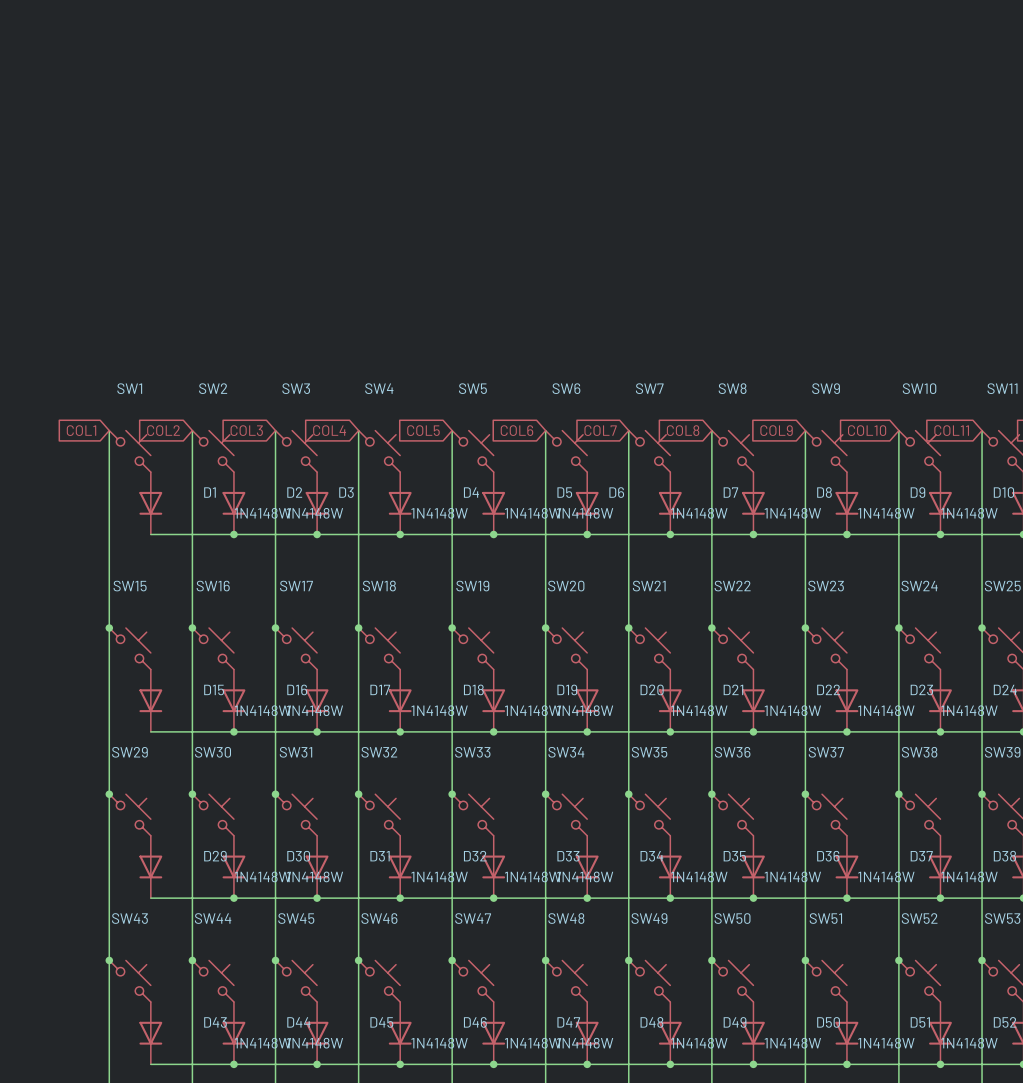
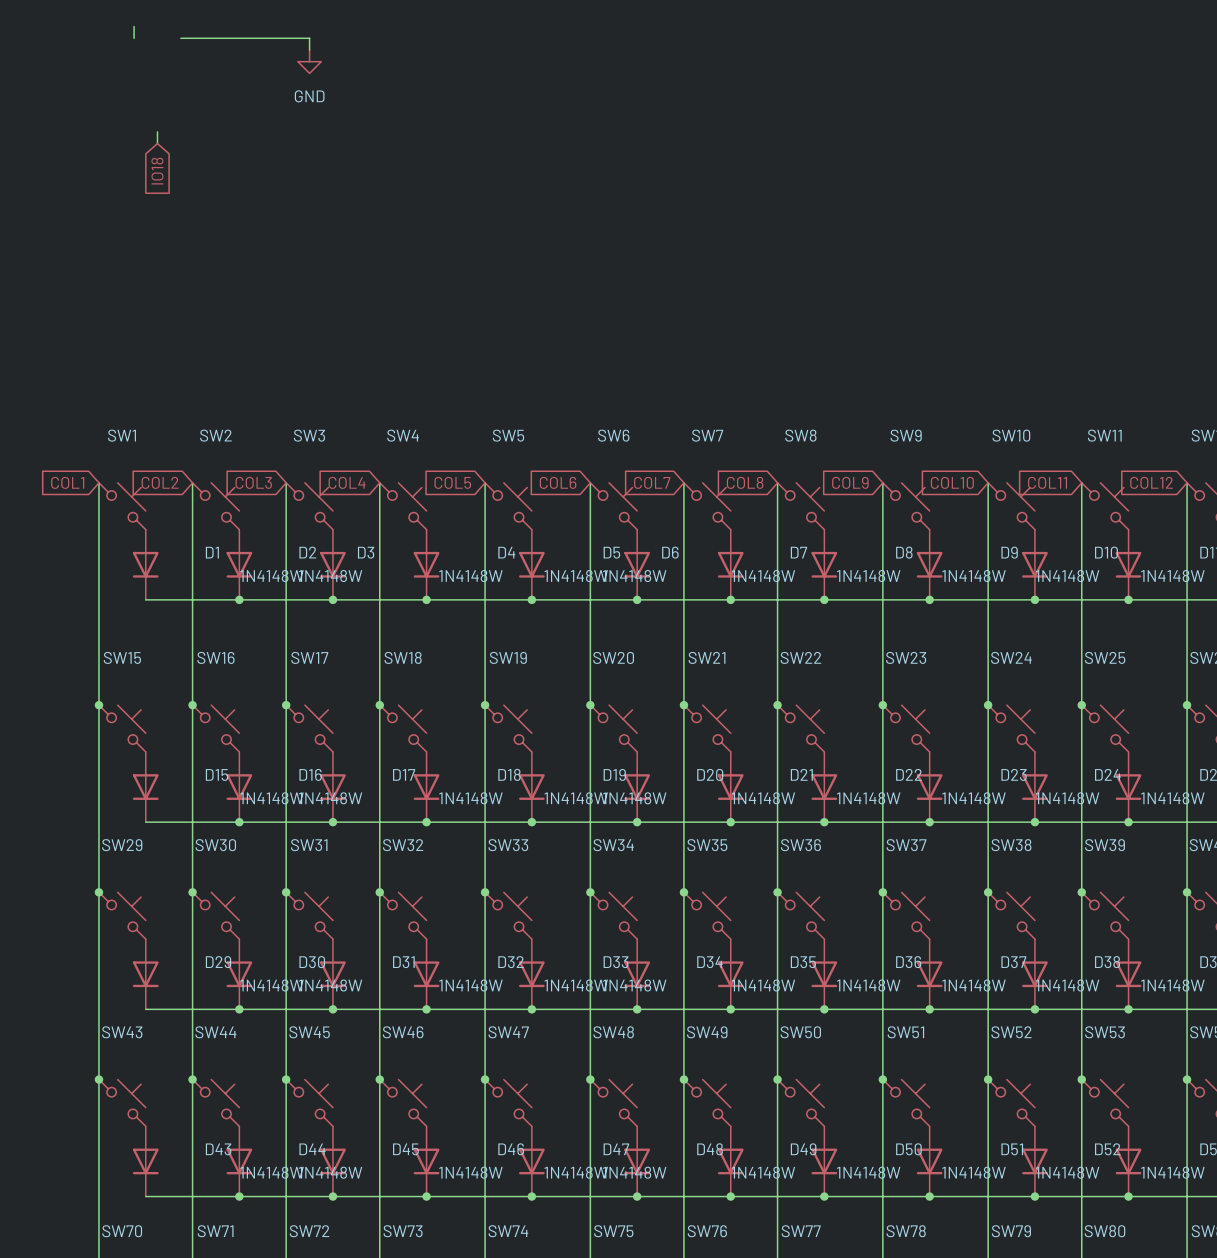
wire: none -> (134, 26) (134, 38)
wire: none -> (180, 38) (309, 38) (309, 49)
power symbol: none -> GND (309, 61)
wire: none -> (157, 131) (157, 143)
global label: none -> IO18 (157, 171)

